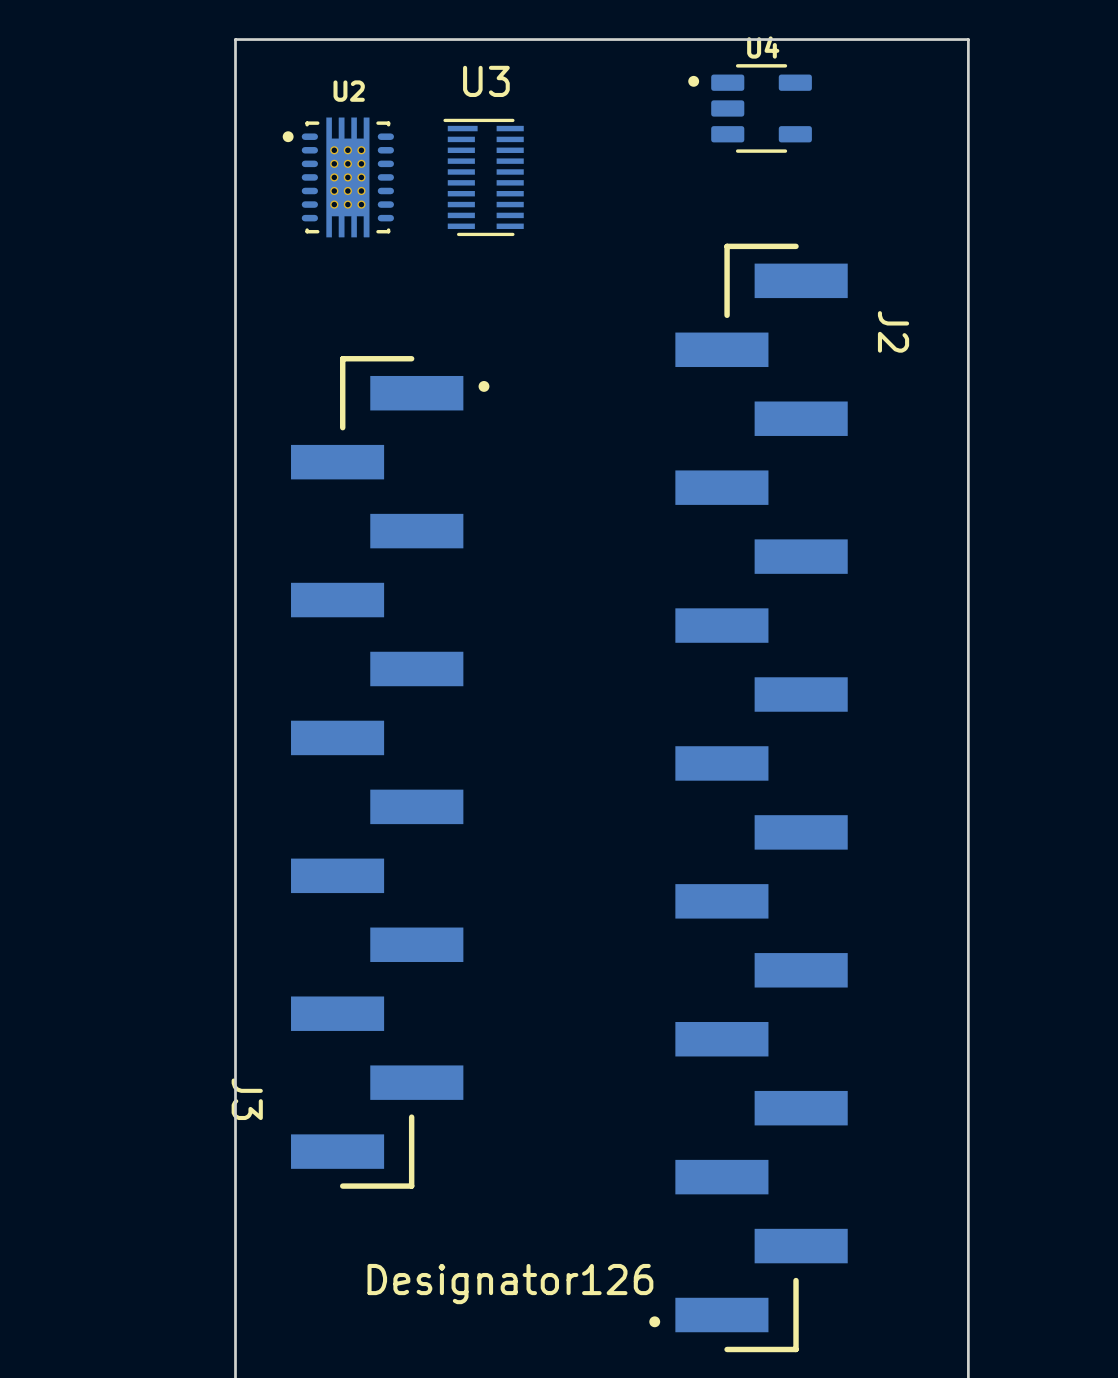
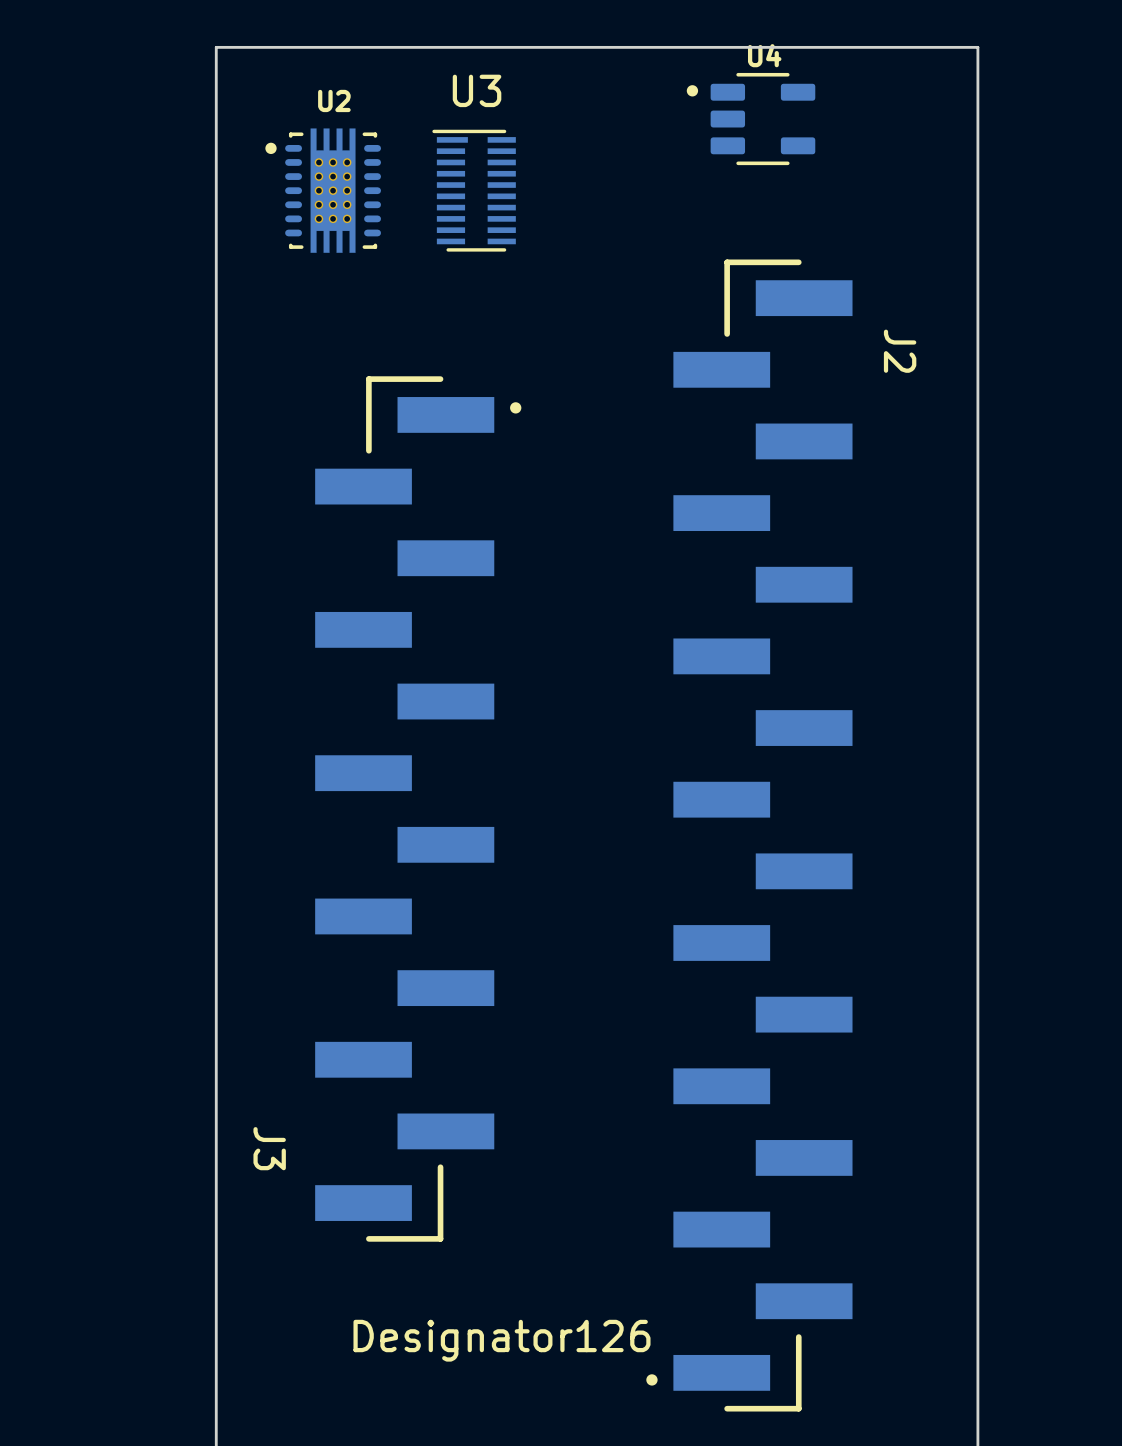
J3 position: (390, 772) -> (418, 809)

